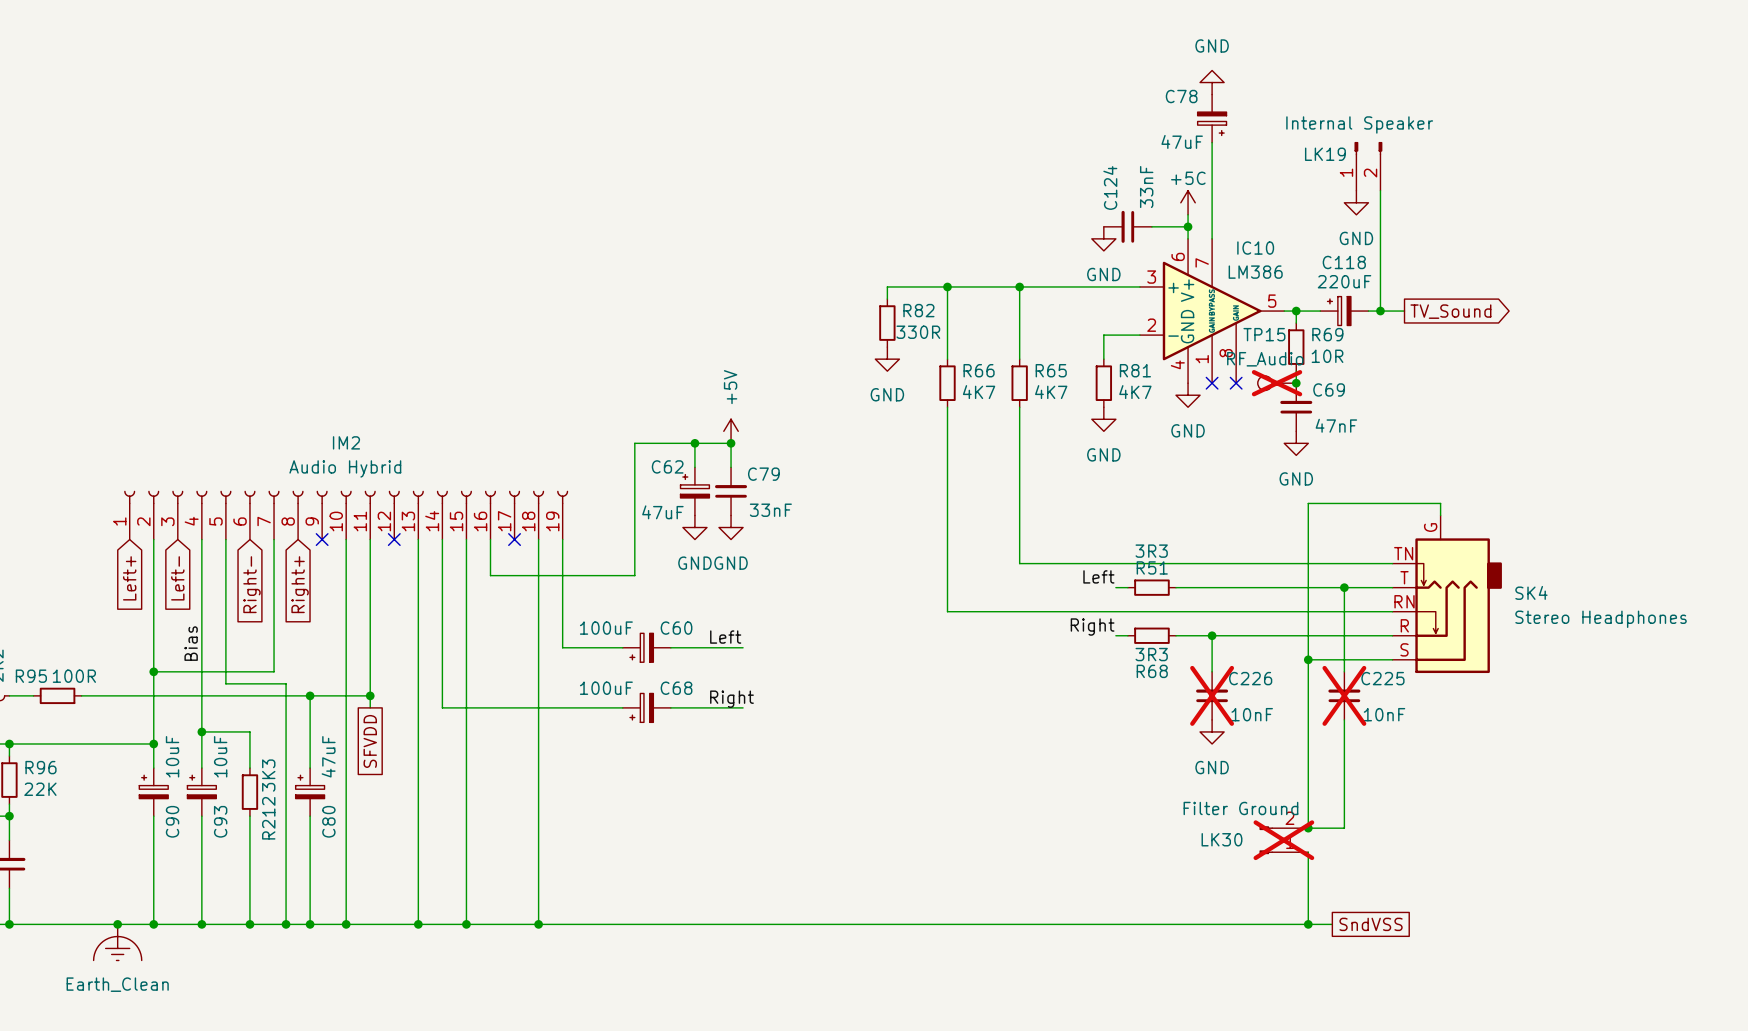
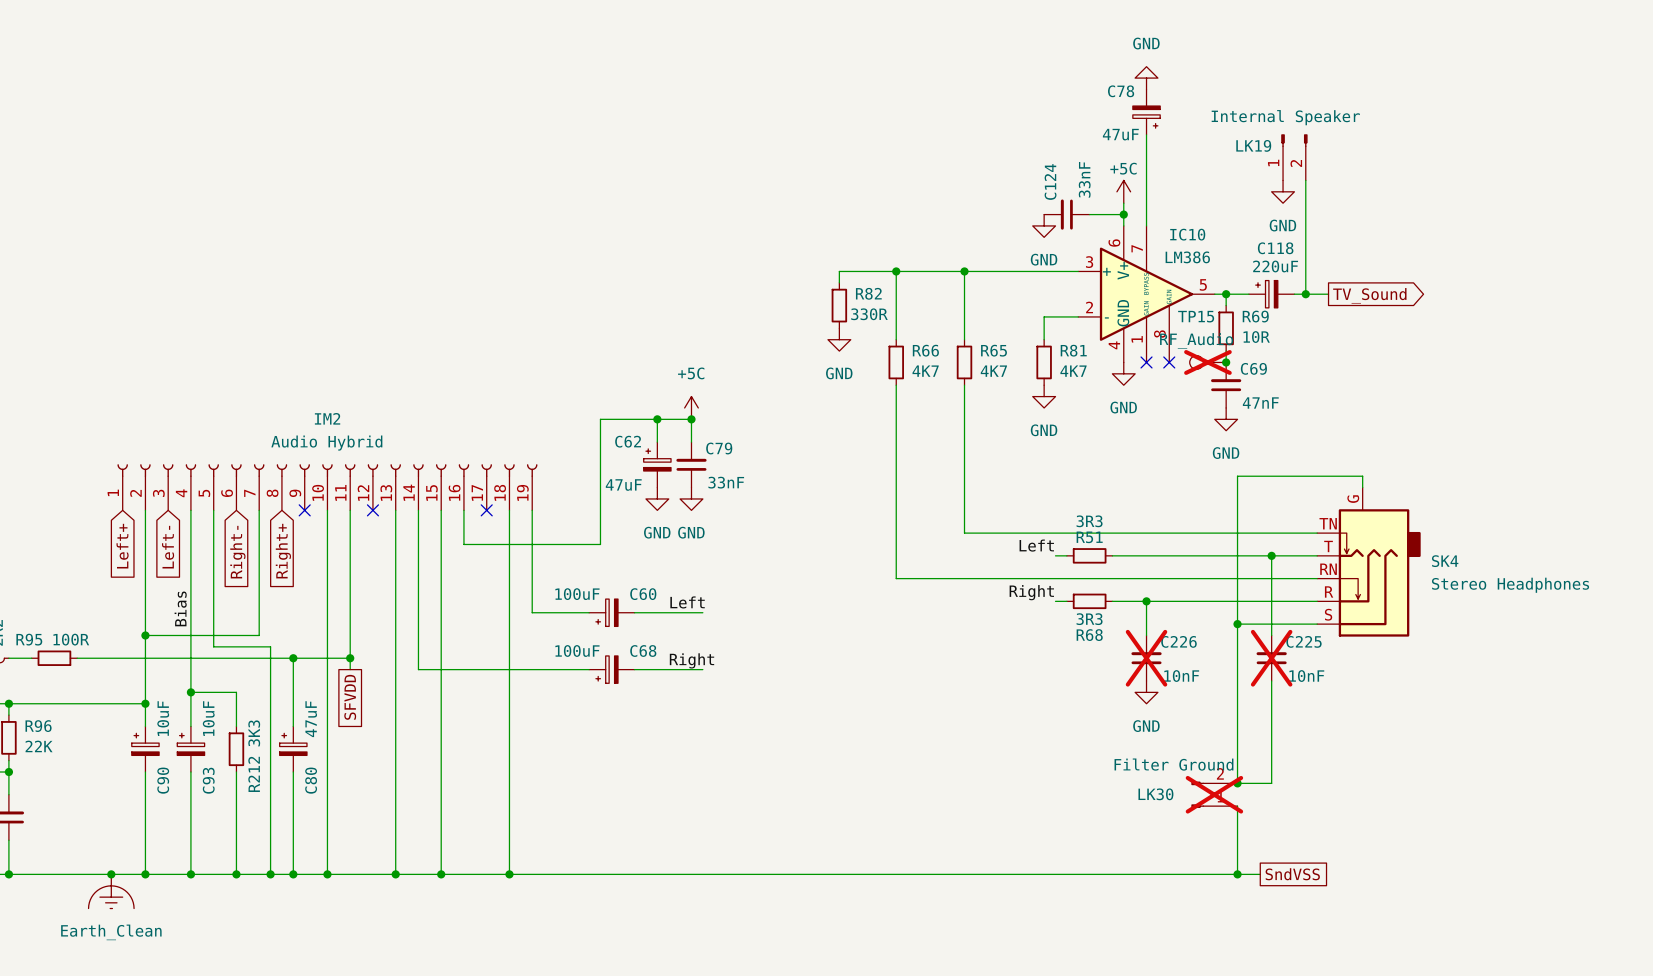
power symbol: +5V (731, 431) -> +5C (691, 407)

